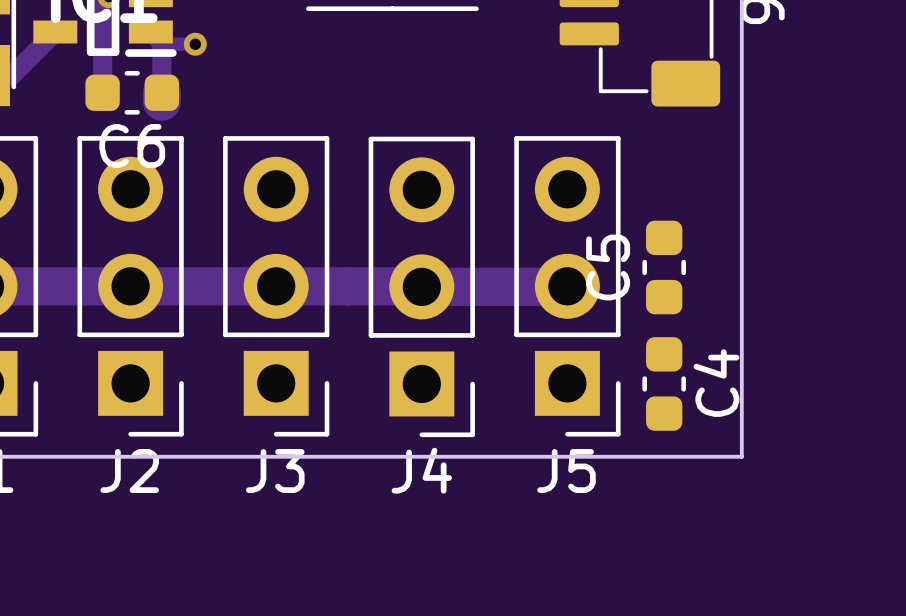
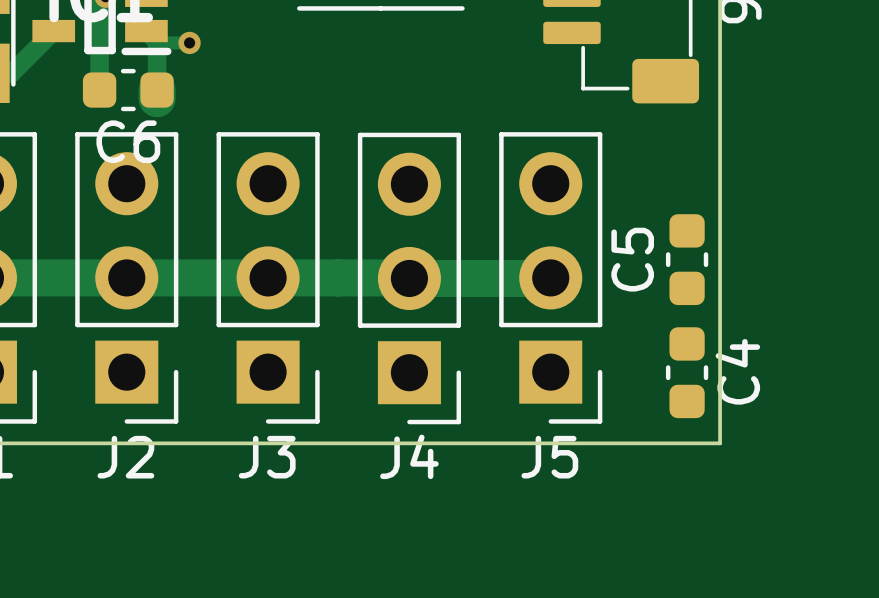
C5 position: (664, 267) -> (687, 259)
C4 position: (664, 383) -> (687, 372)

